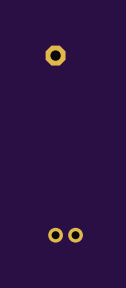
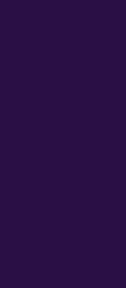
part: (55, 55) -> none
part: (65, 235) -> none

